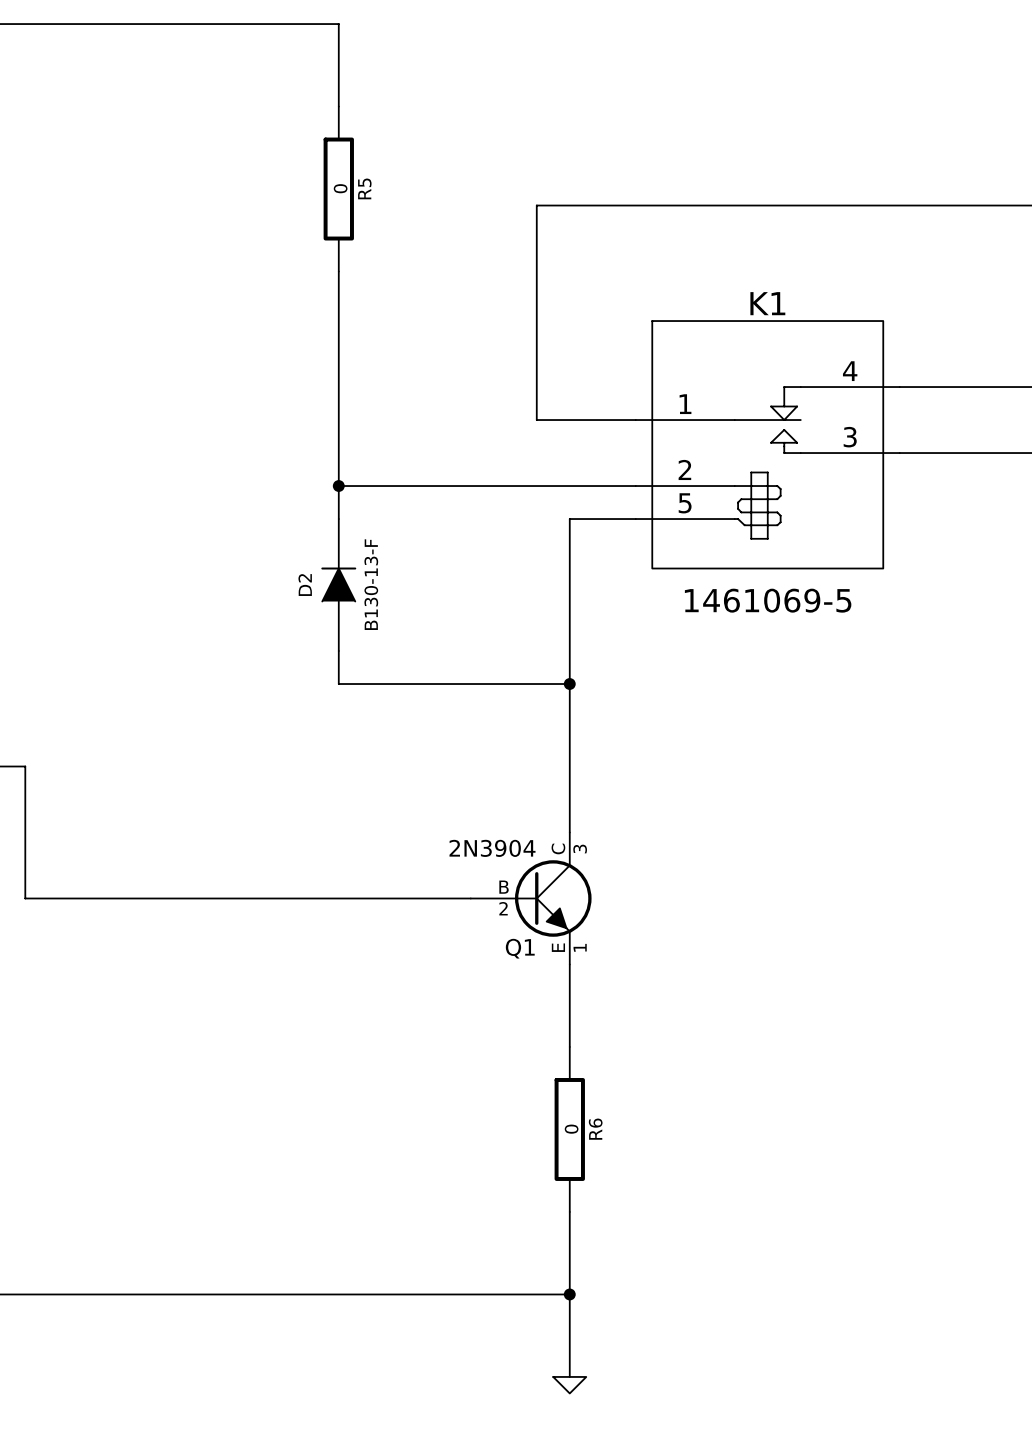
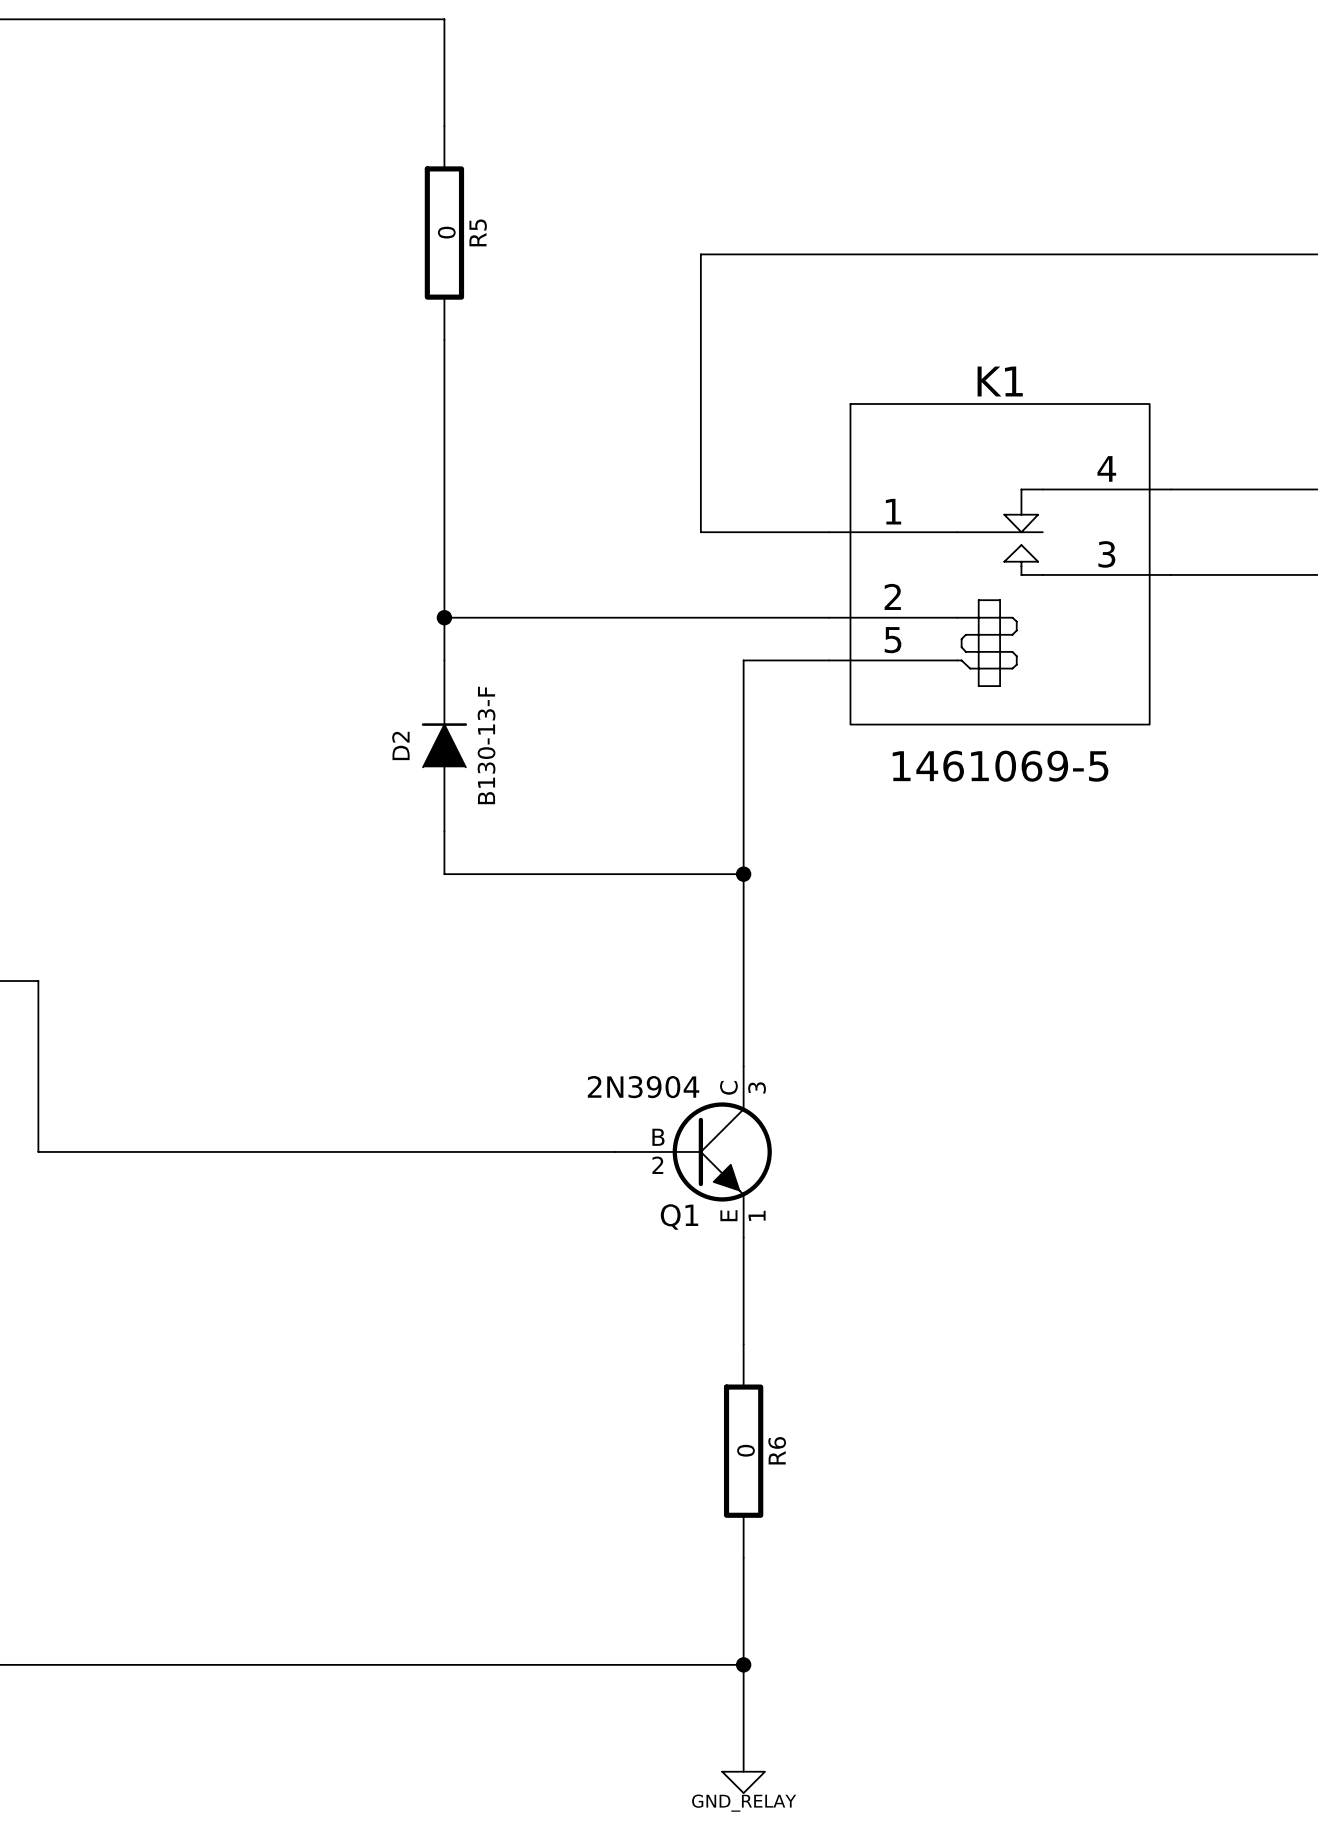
power symbol text: none -> GND_RELAY (744, 1803)

